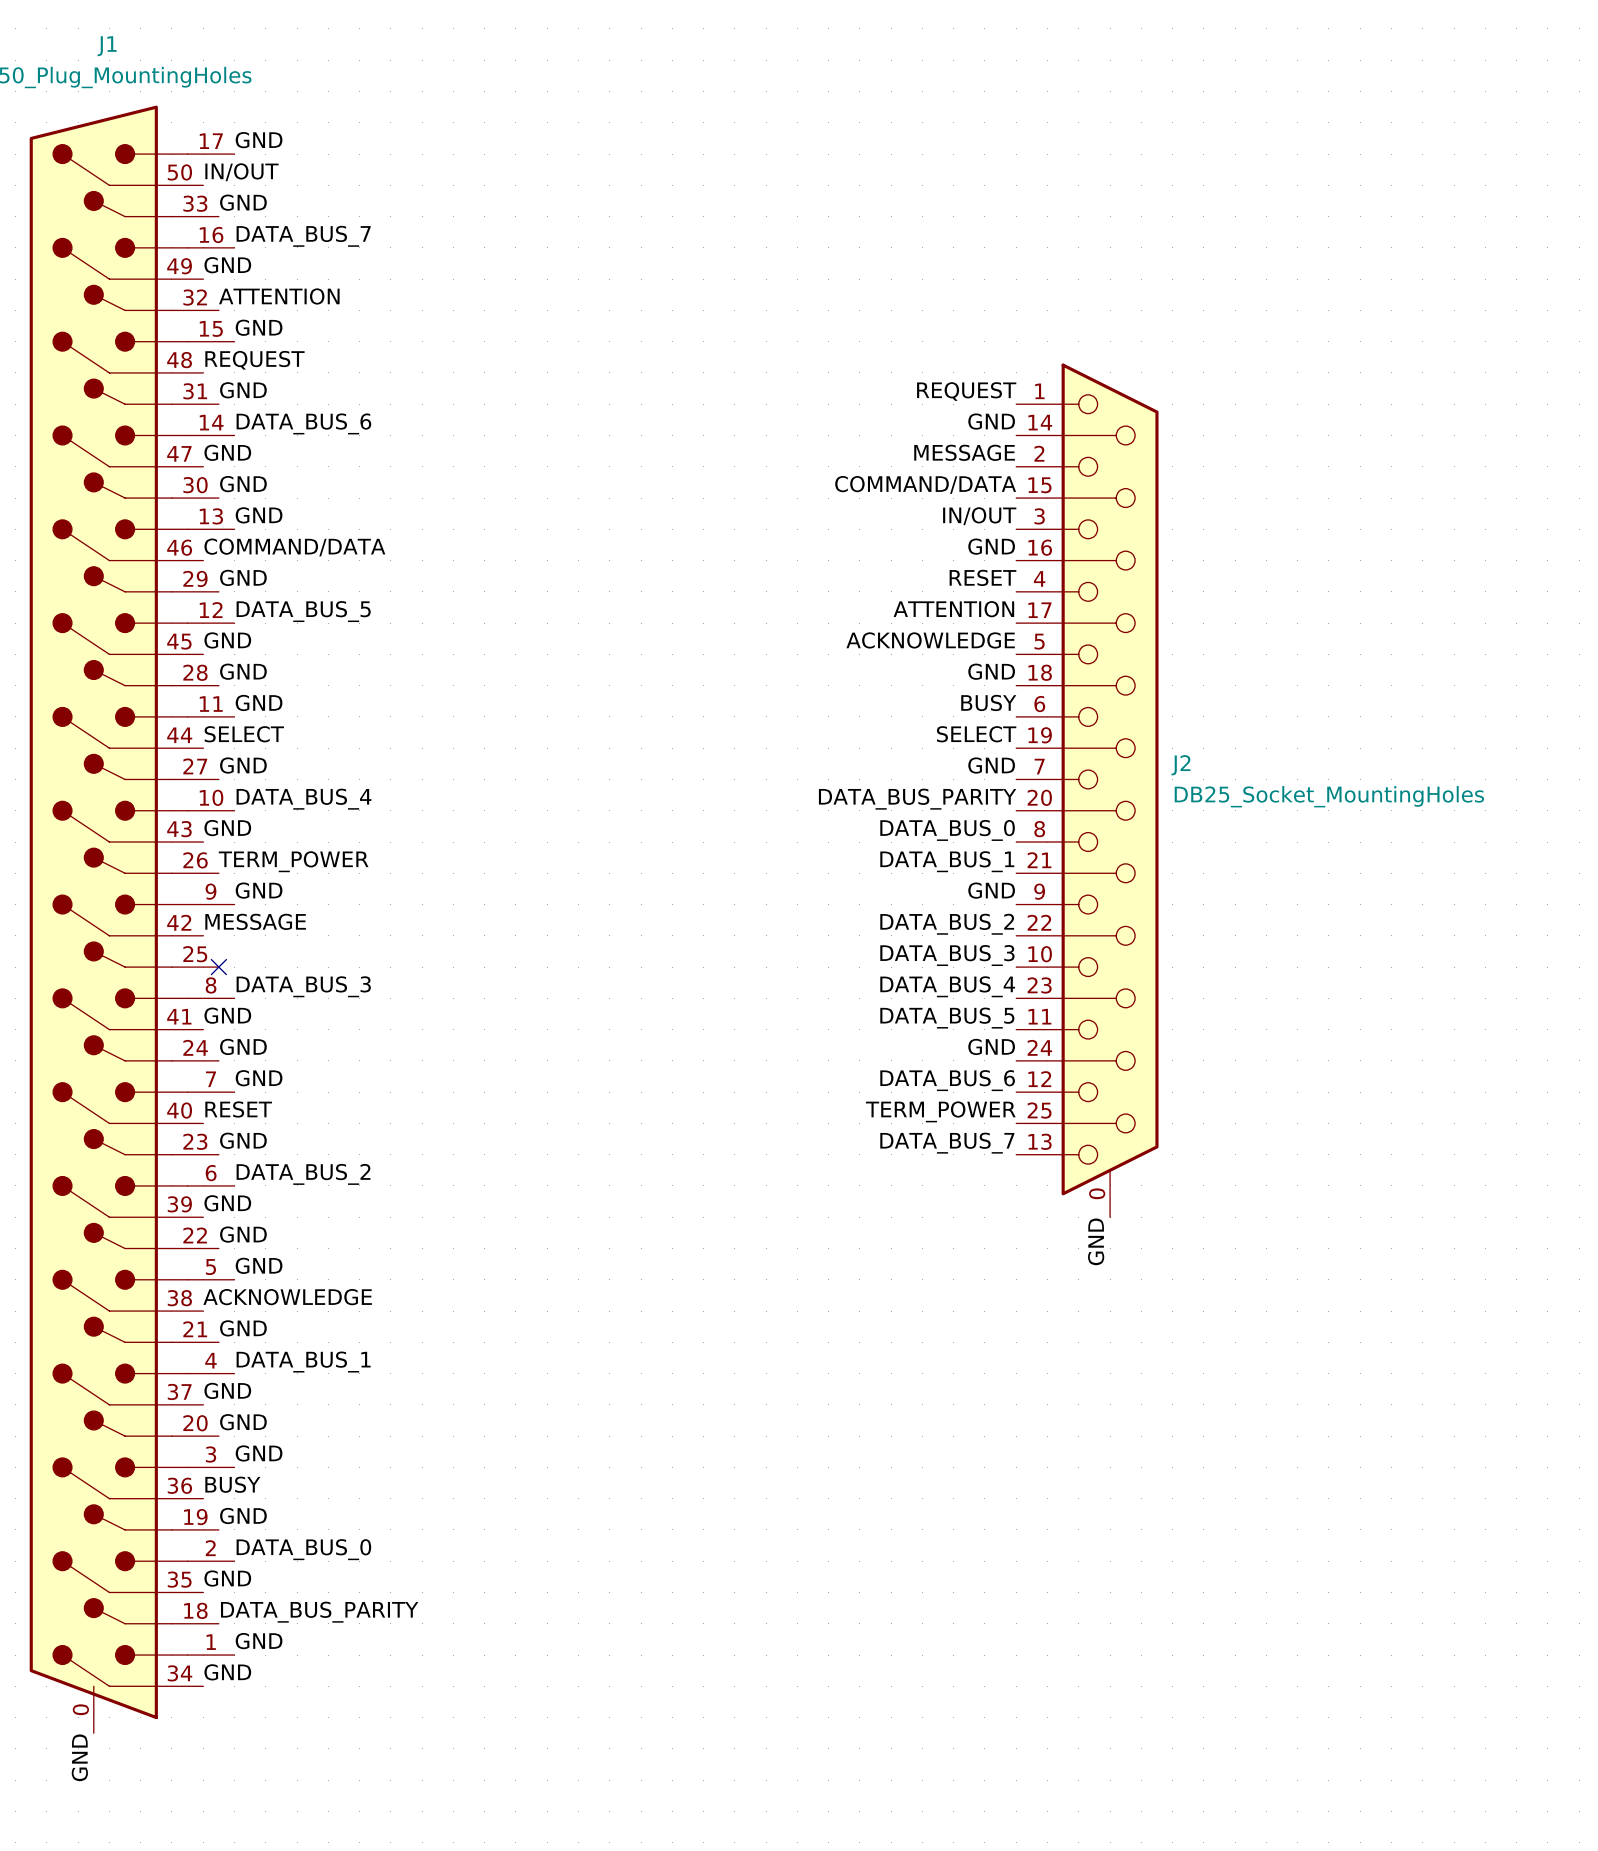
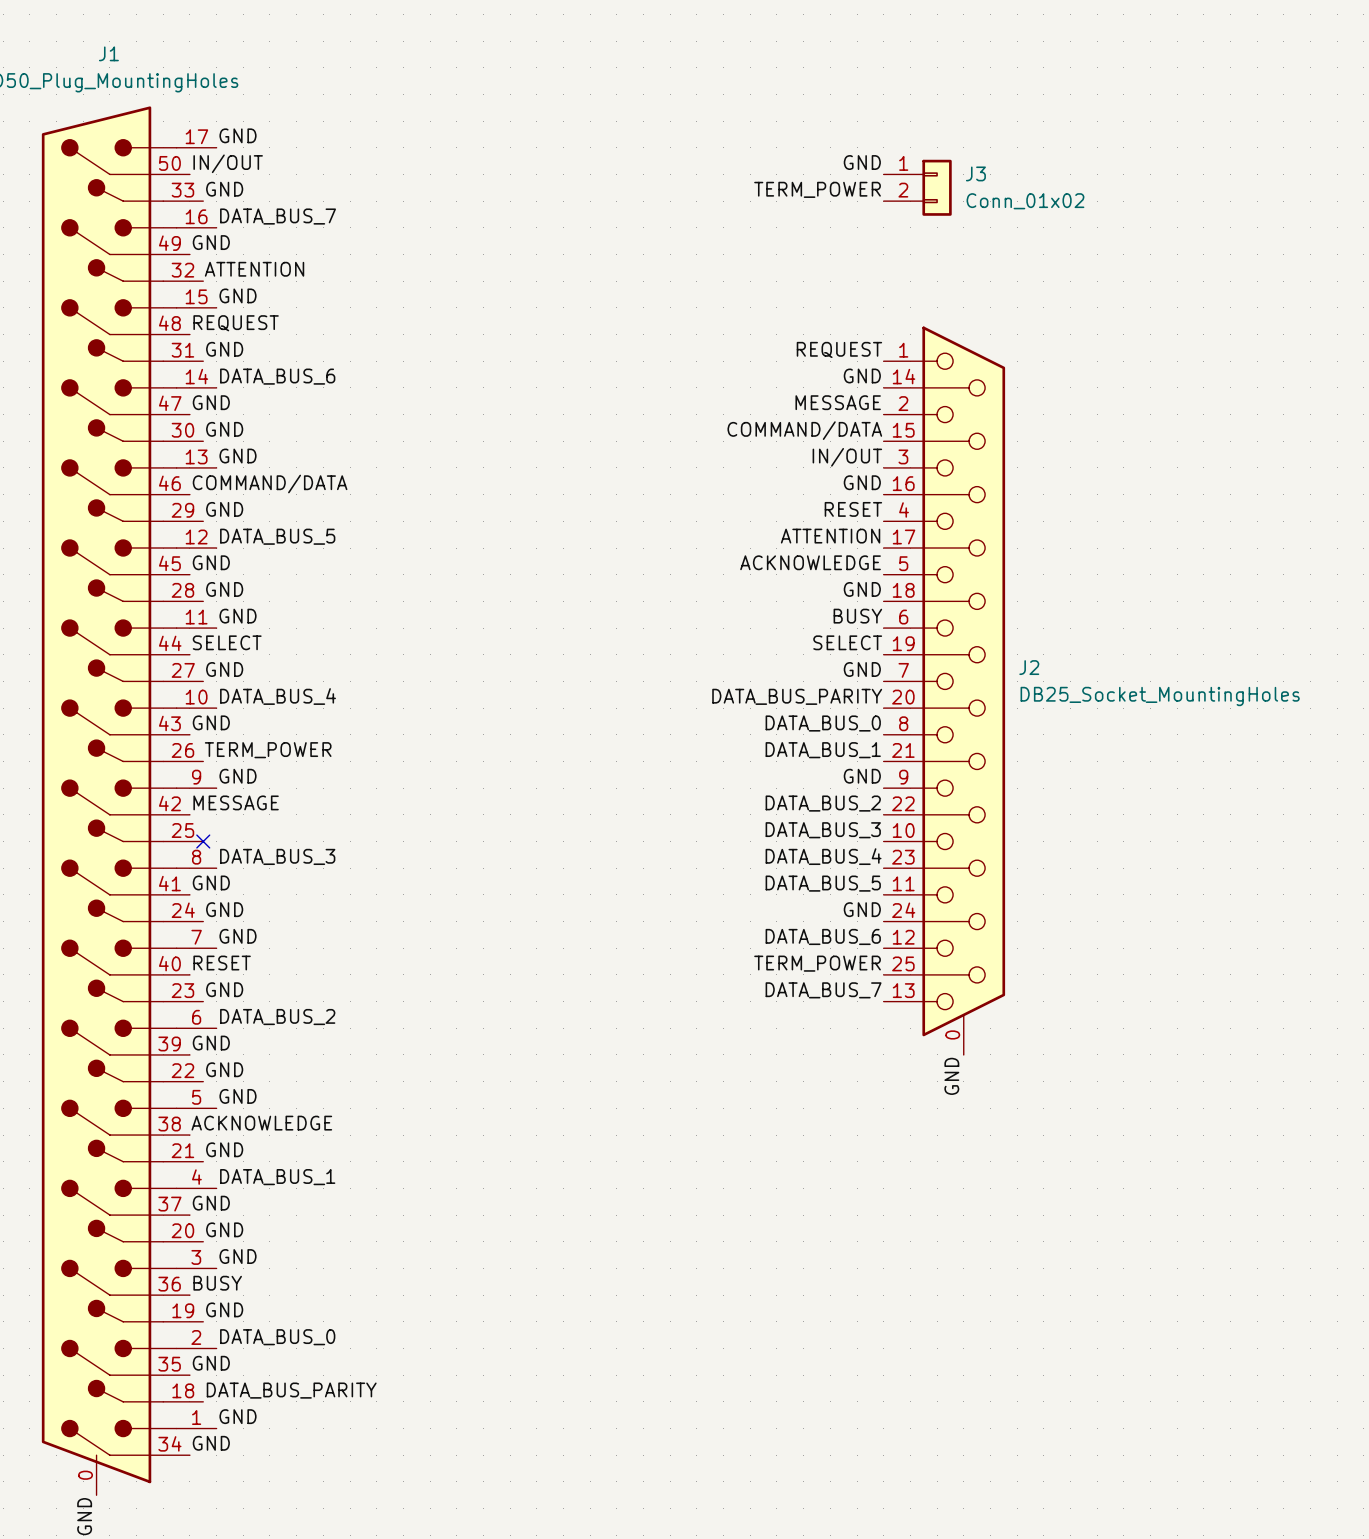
label: none -> GND (862, 162)
J3: none -> Conn_01x02 (917, 187)
label: none -> TERM_POWER (817, 189)

